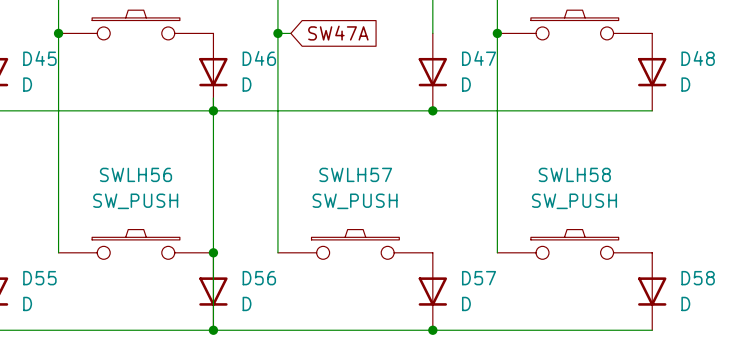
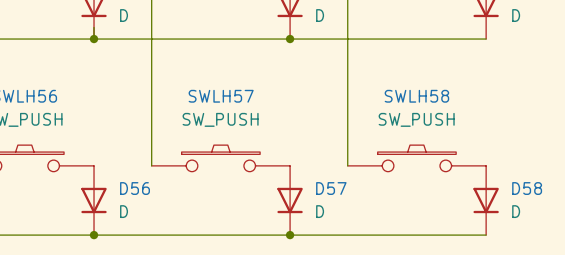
wire: (213, 110) (213, 330) -> none
junction: (213, 252) -> none

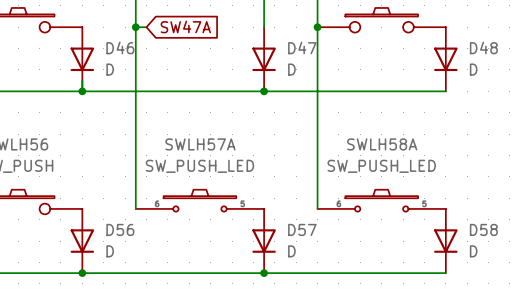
SWLH57A: none -> SW_PUSH_LED (199, 200)
SWLH58A: none -> SW_PUSH_LED (381, 200)
SWLH57: SW_PUSH (220, 158) -> none
SWLH58: SW_PUSH (416, 158) -> none

